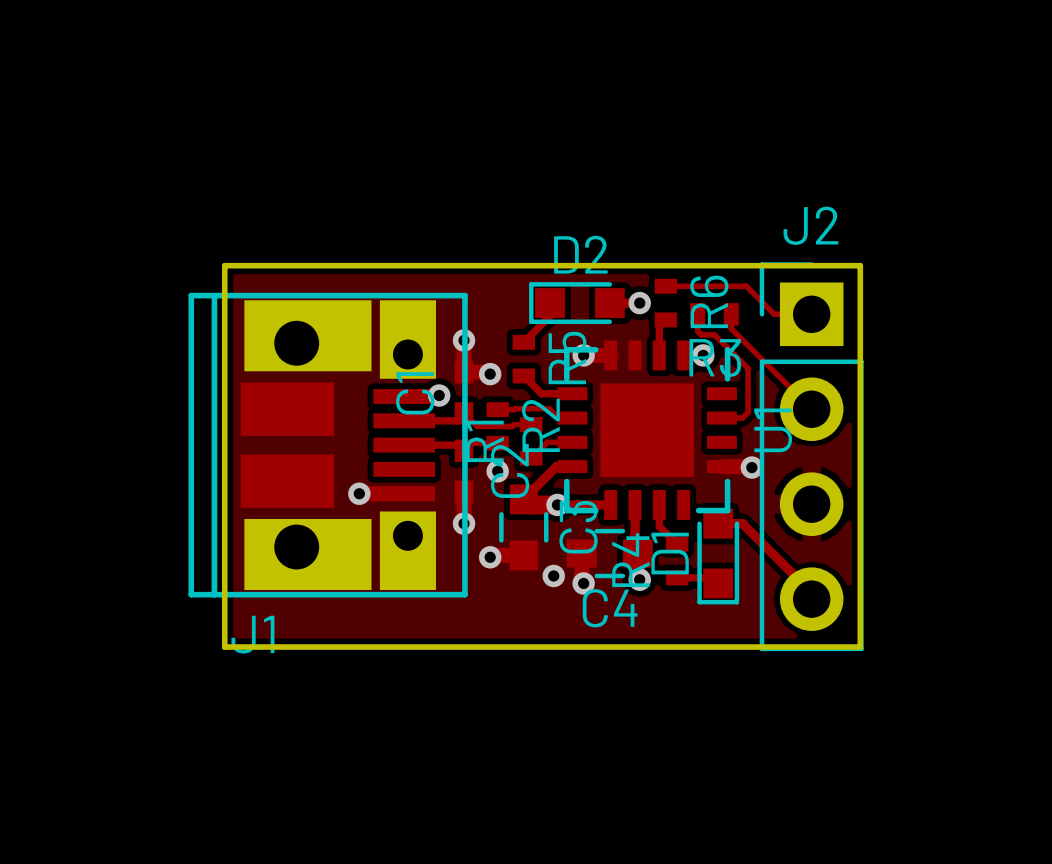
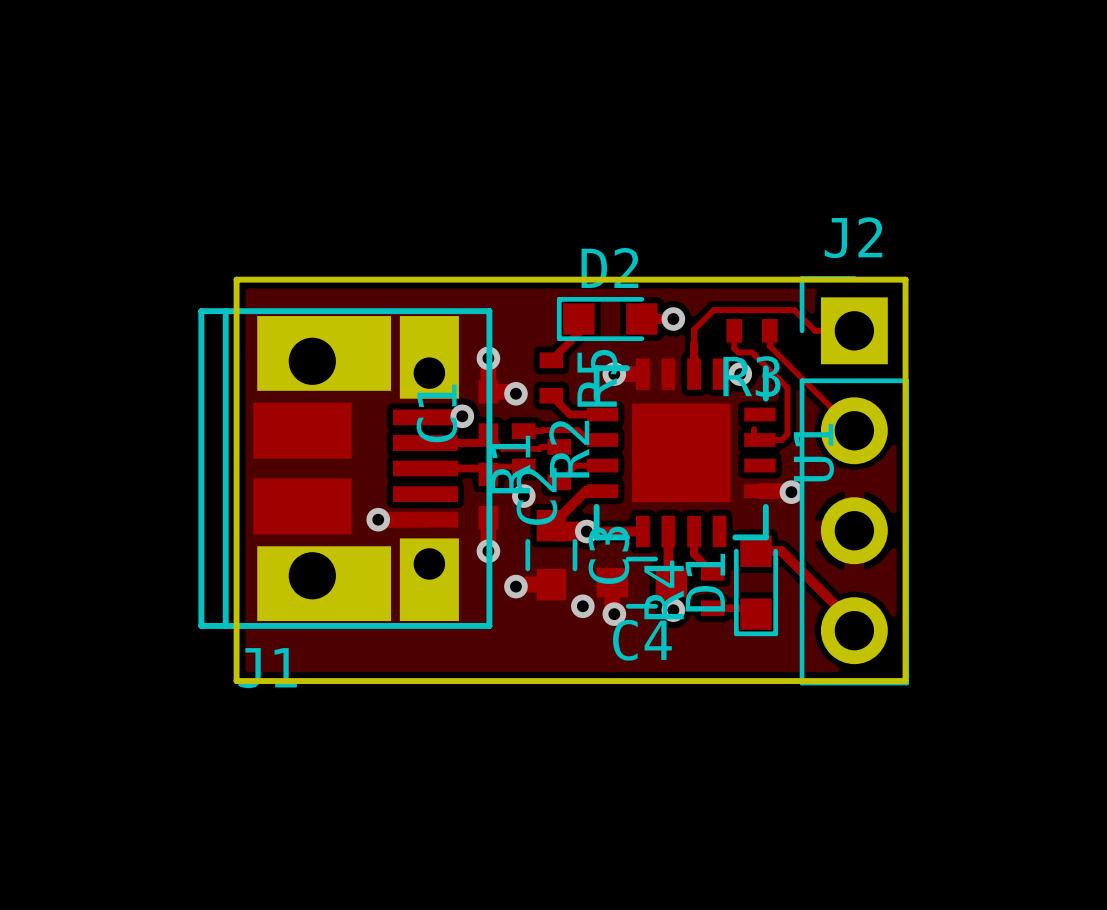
track: (665, 286) (746, 286) (754, 294) -> (694, 343) (694, 329) (713, 310) (794, 310)
R6: (665, 303) -> none
track: none -> (754, 429) (754, 433)

